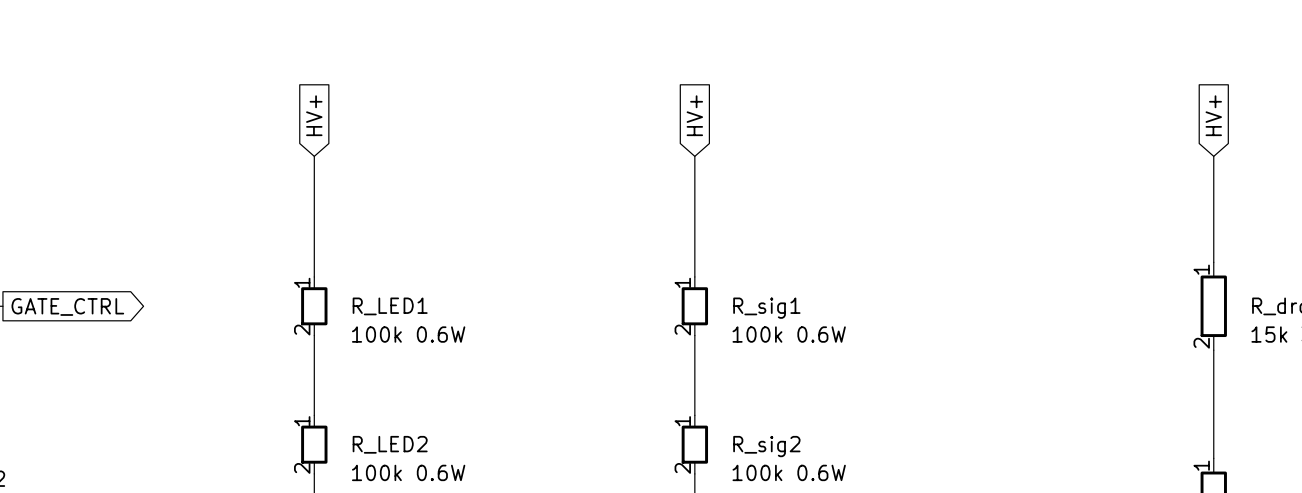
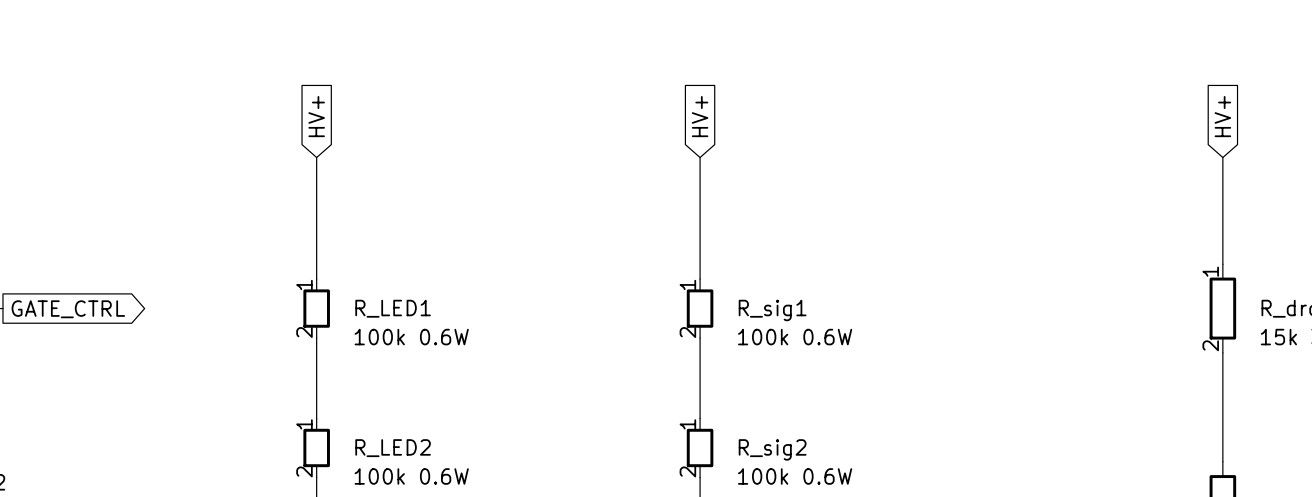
part pin number: 1 (1201, 465) -> none

